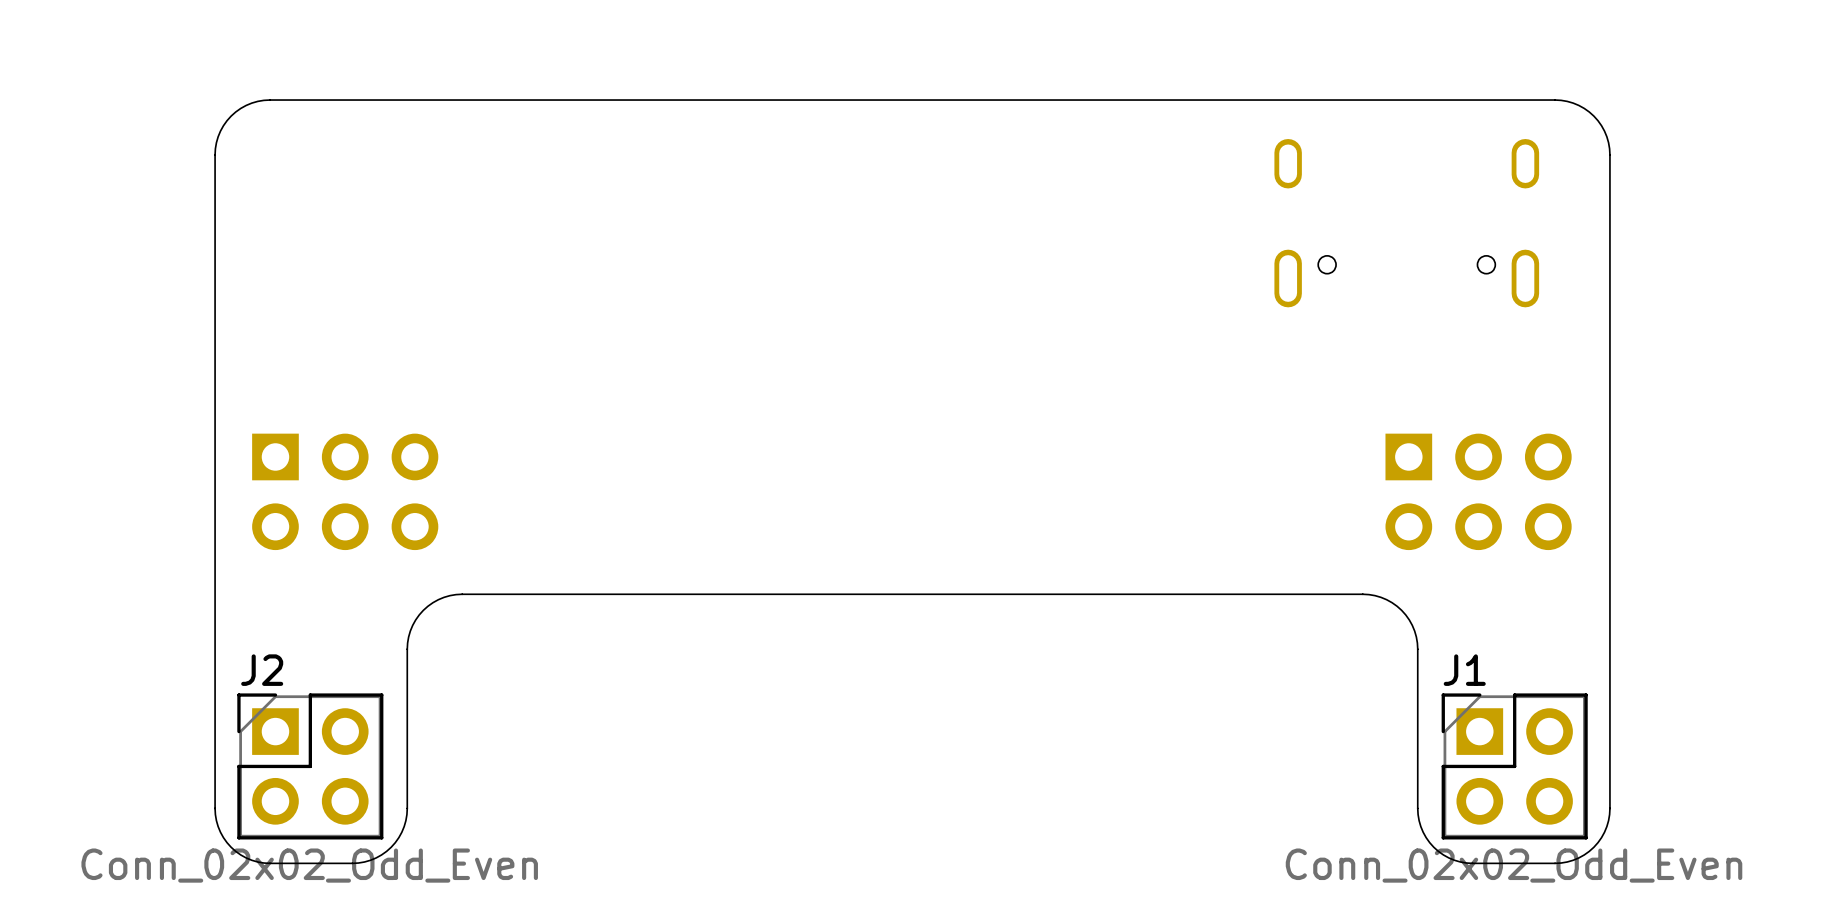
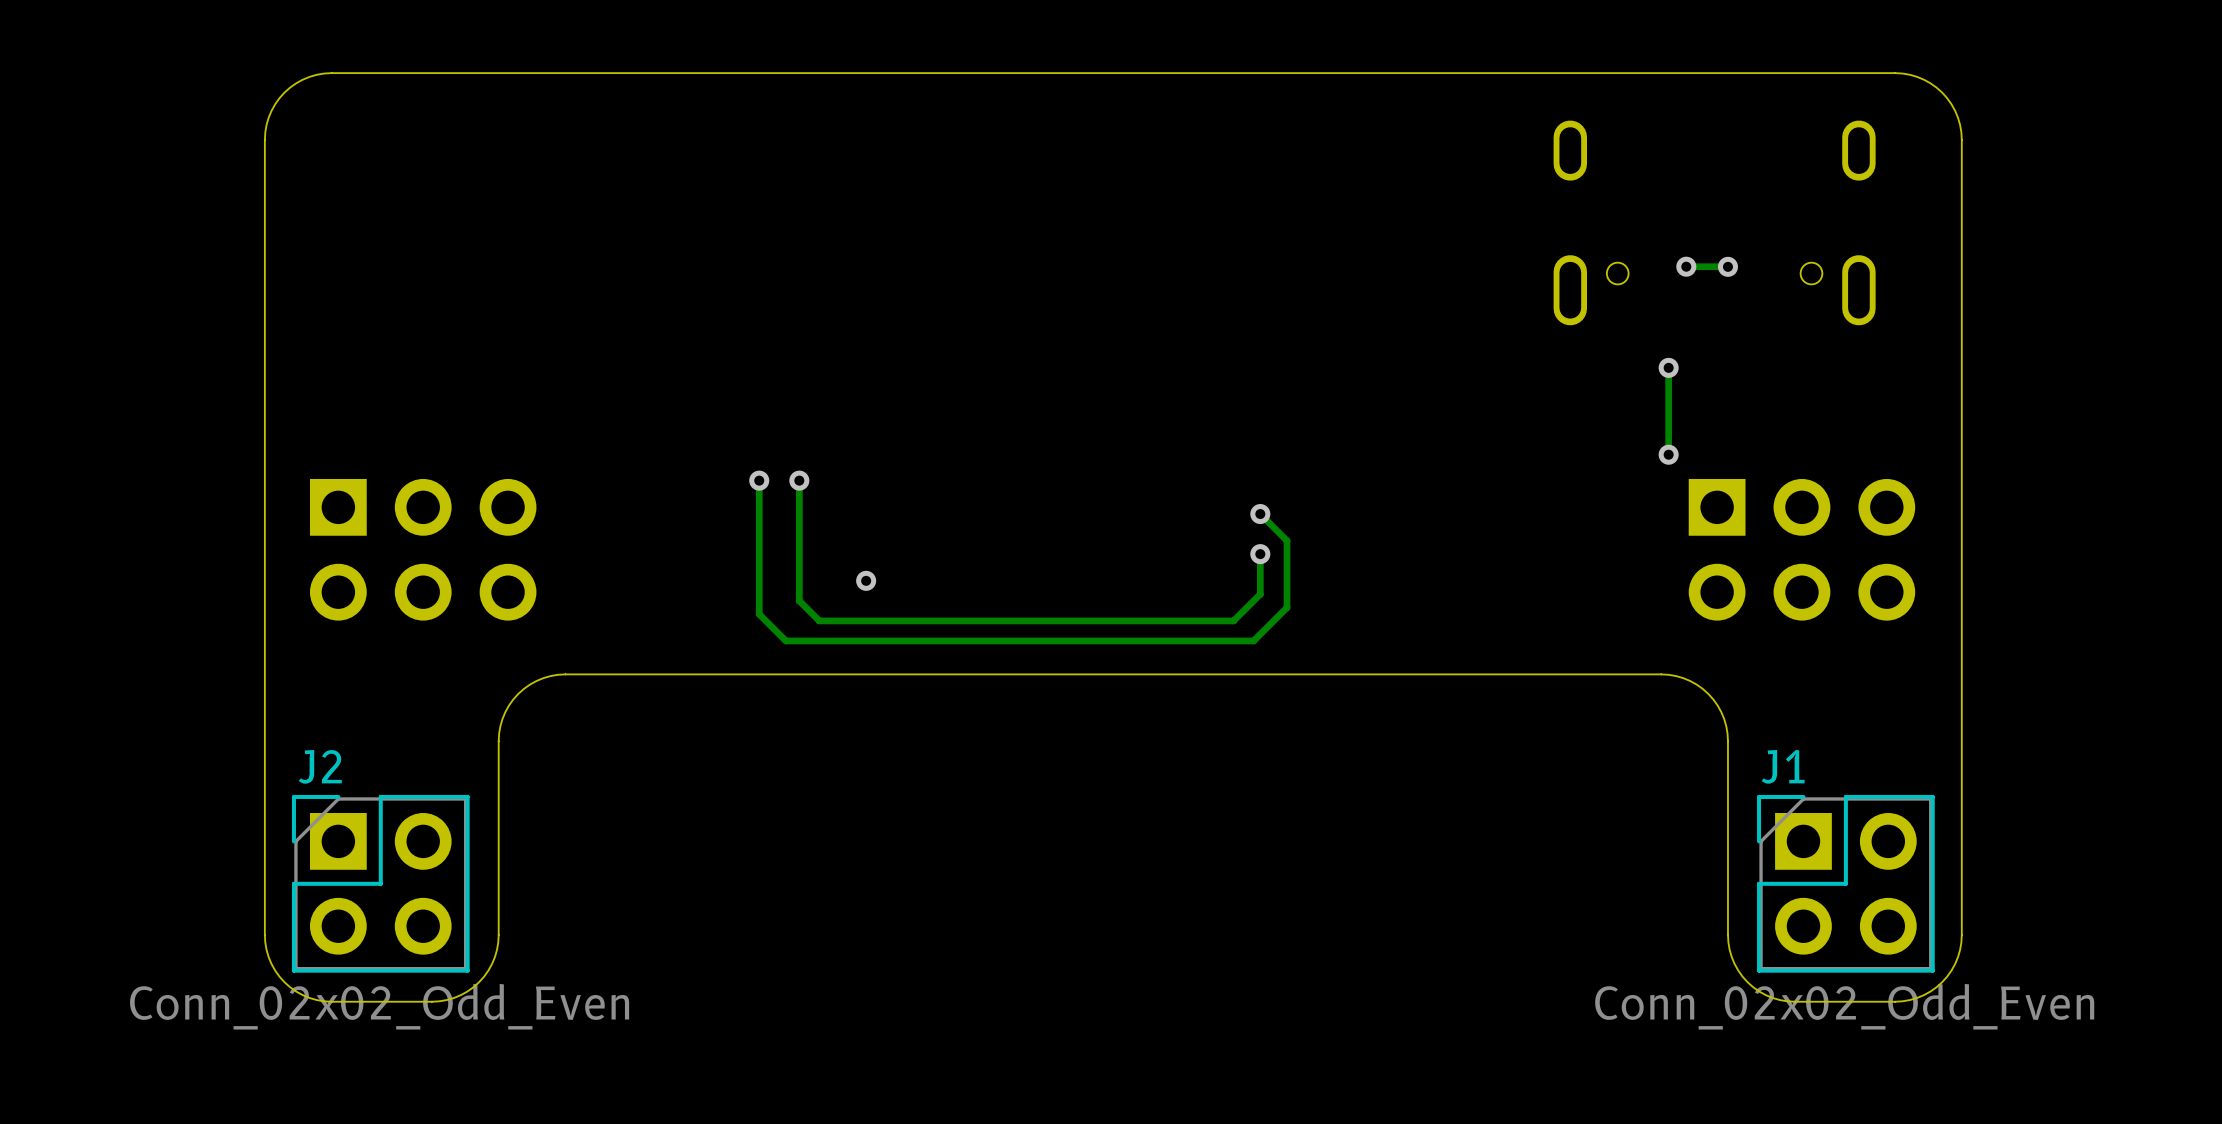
via: none -> (1686, 266)
track: none -> (1727, 266) (1686, 266)
via: none -> (1727, 266)
track: none -> (1668, 367) (1668, 454)
via: none -> (1668, 367)
via: none -> (1668, 454)
track: none -> (759, 480) (759, 614) (785, 640) (1253, 640) (1287, 607) (1287, 540) (1260, 514)
via: none -> (759, 480)
track: none -> (799, 480) (799, 600) (819, 620) (1233, 620) (1260, 594) (1260, 554)
via: none -> (799, 480)
via: none -> (1260, 514)
via: none -> (1260, 554)
via: none -> (866, 580)

